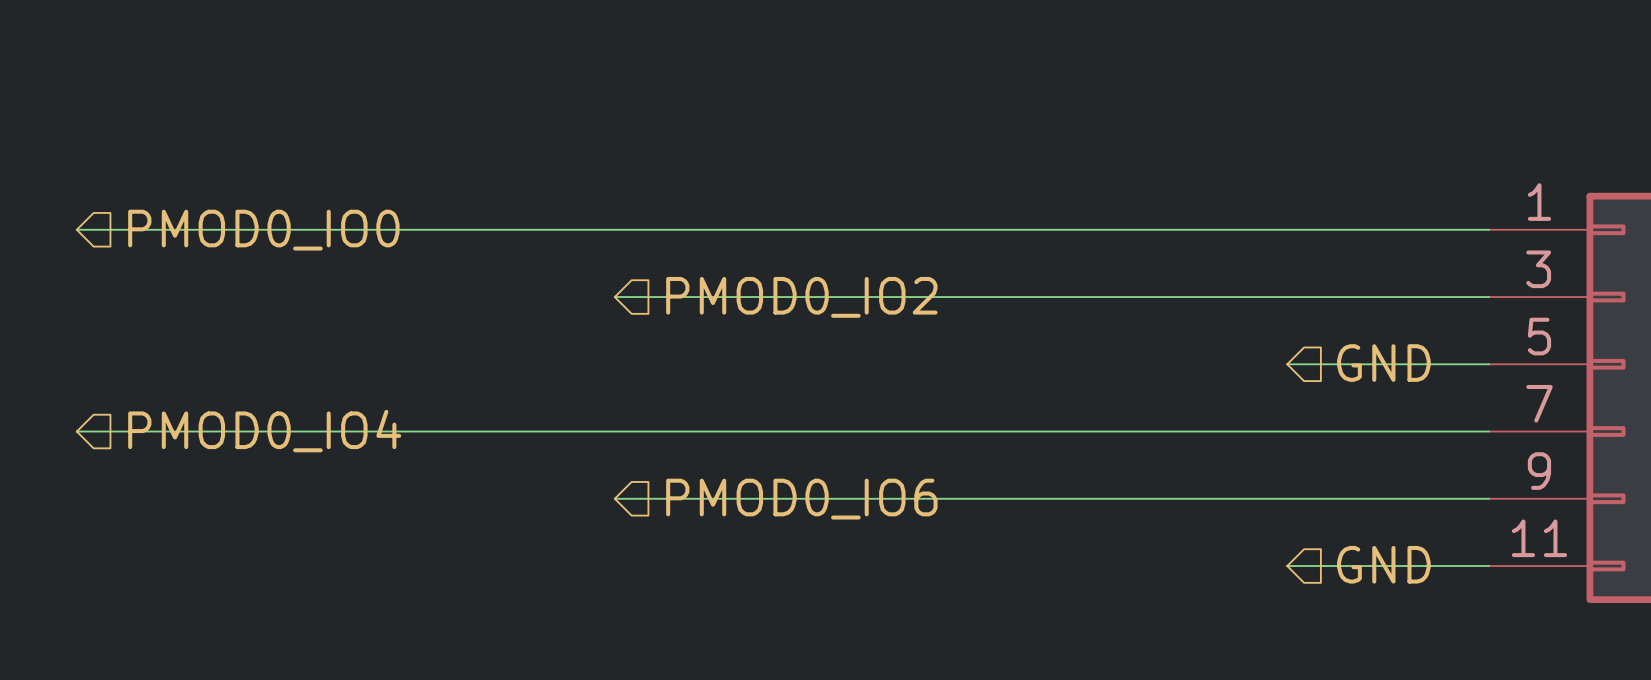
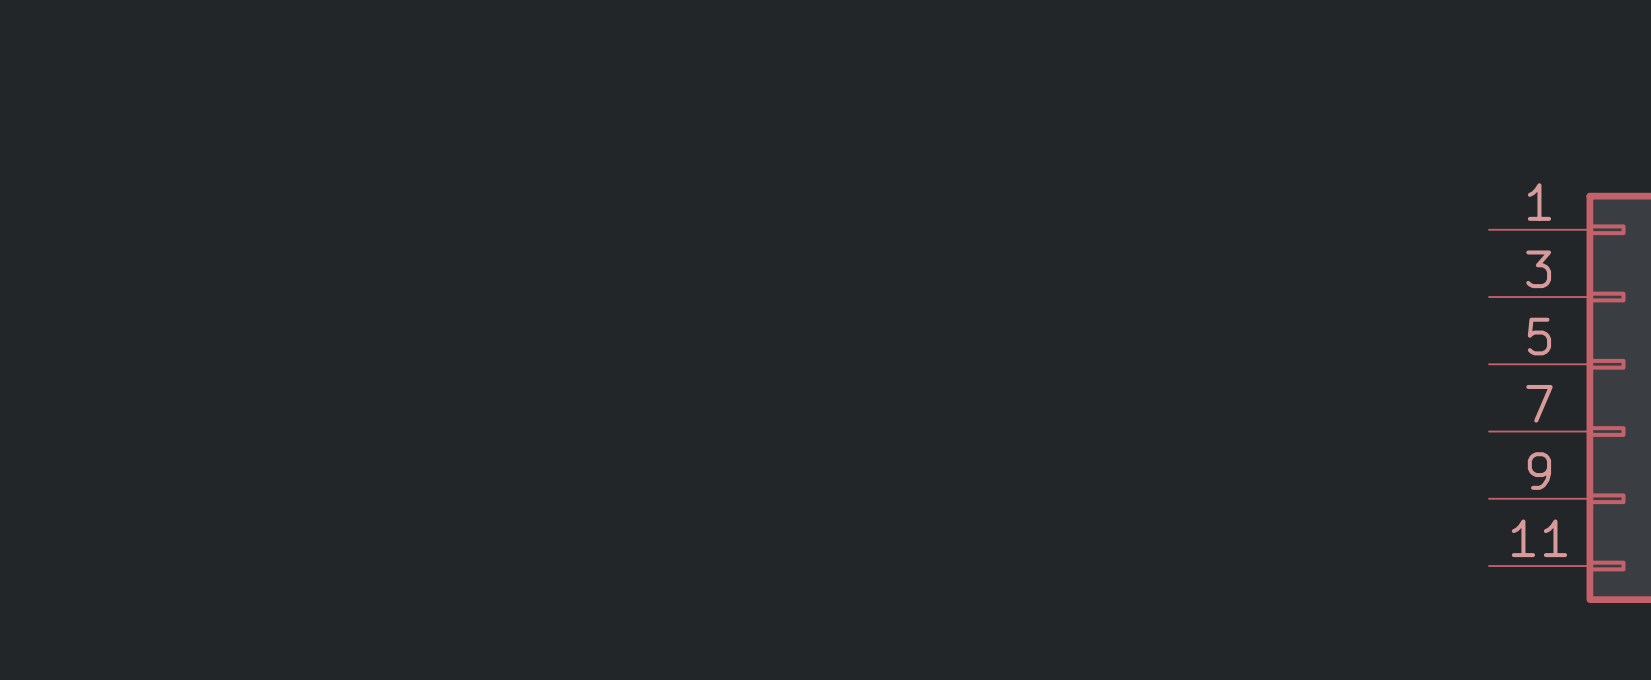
wire: (76, 229) (1489, 229) -> none
hierarchical label: PMOD0_IO0 (263, 230) -> none
wire: (614, 297) (1489, 297) -> none
hierarchical label: PMOD0_IO2 (801, 297) -> none
hierarchical label: GND (1383, 363) -> none
wire: (1287, 364) (1489, 364) -> none
wire: (76, 431) (1489, 431) -> none
hierarchical label: PMOD0_IO4 (264, 431) -> none
wire: (614, 498) (1489, 498) -> none
hierarchical label: PMOD0_IO6 (801, 499) -> none
hierarchical label: GND (1383, 564) -> none
wire: (1287, 566) (1489, 566) -> none

